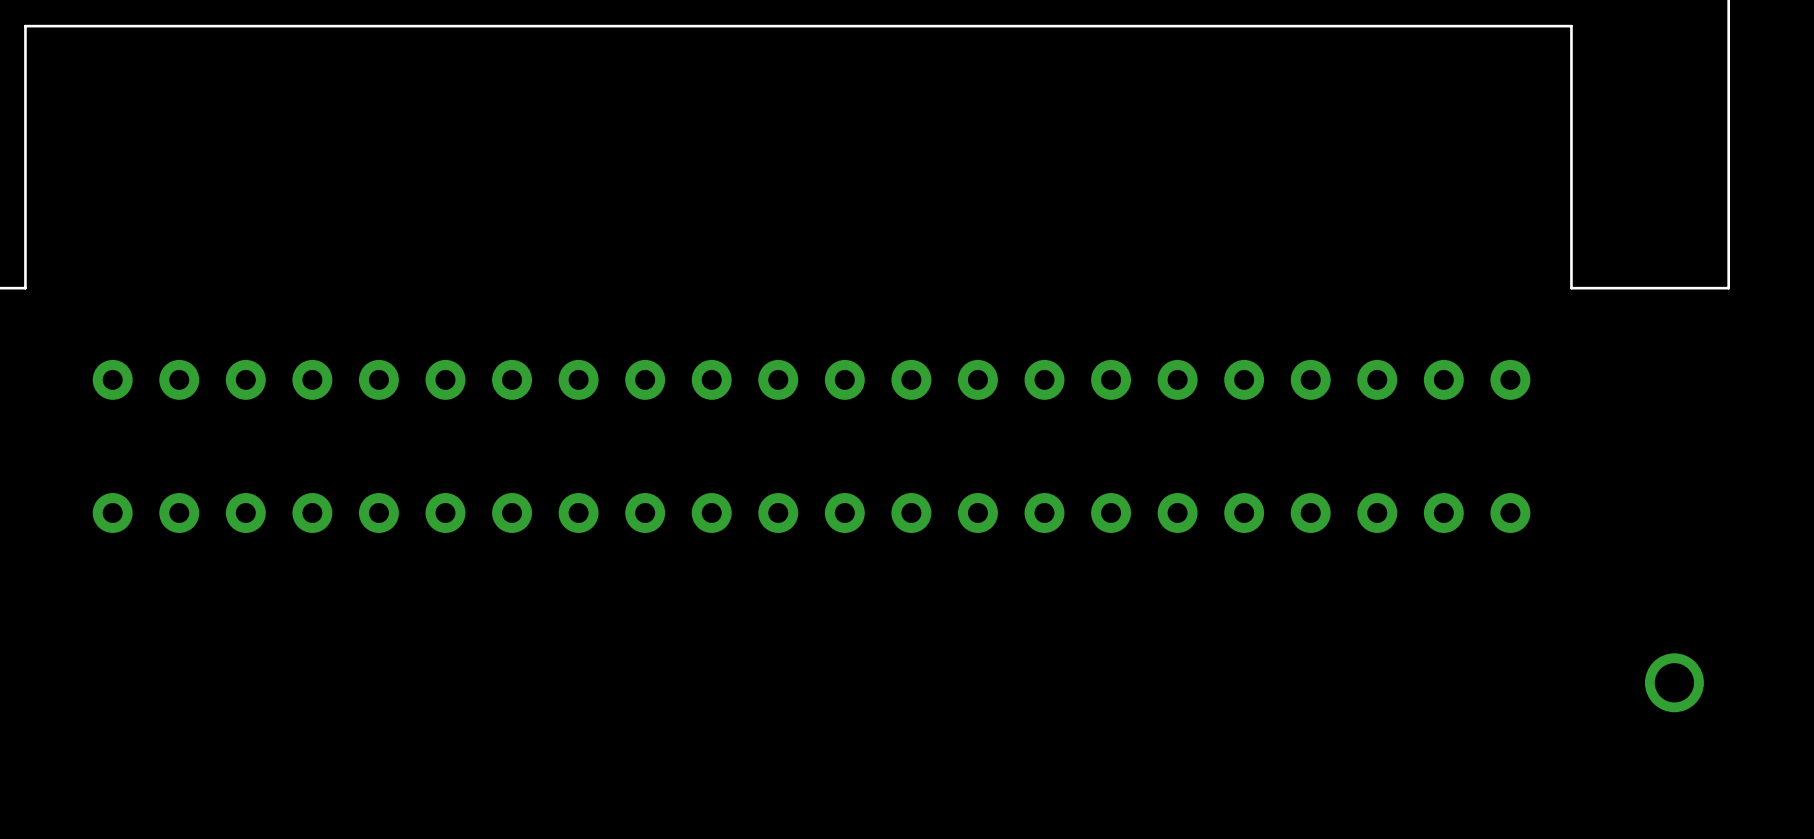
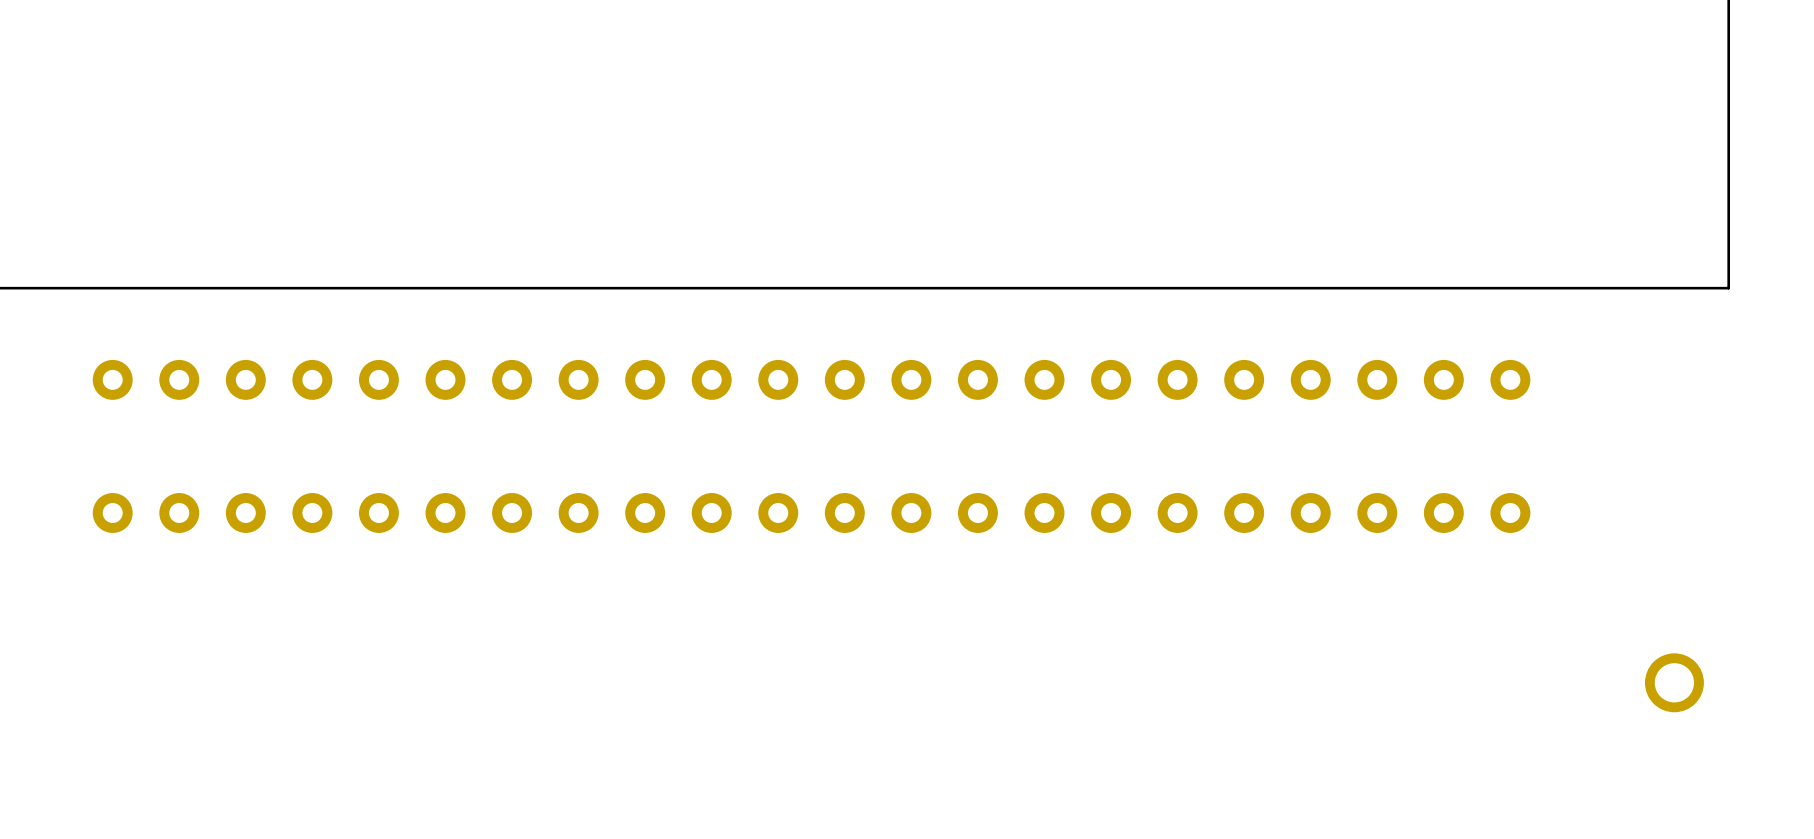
board edge: (1571, 288) (1571, 26) (25, 26) (25, 288) -> (1571, 288) (25, 288)

